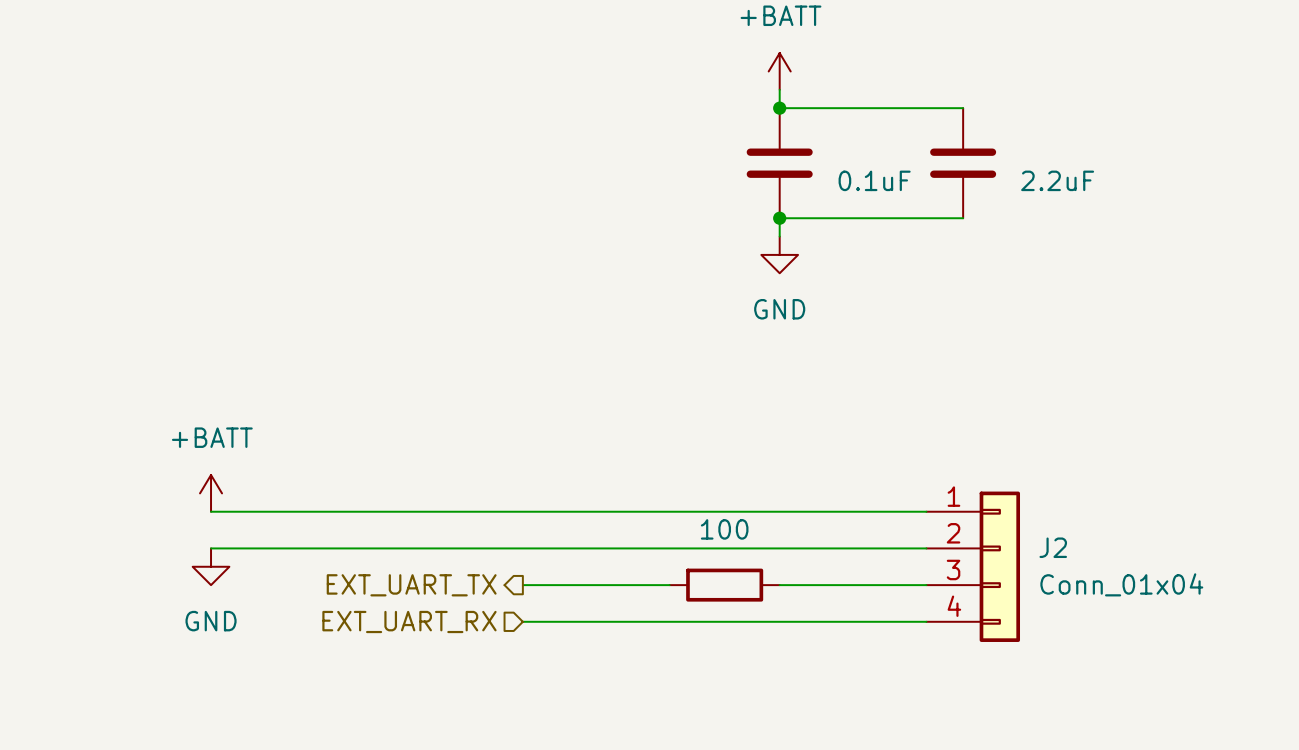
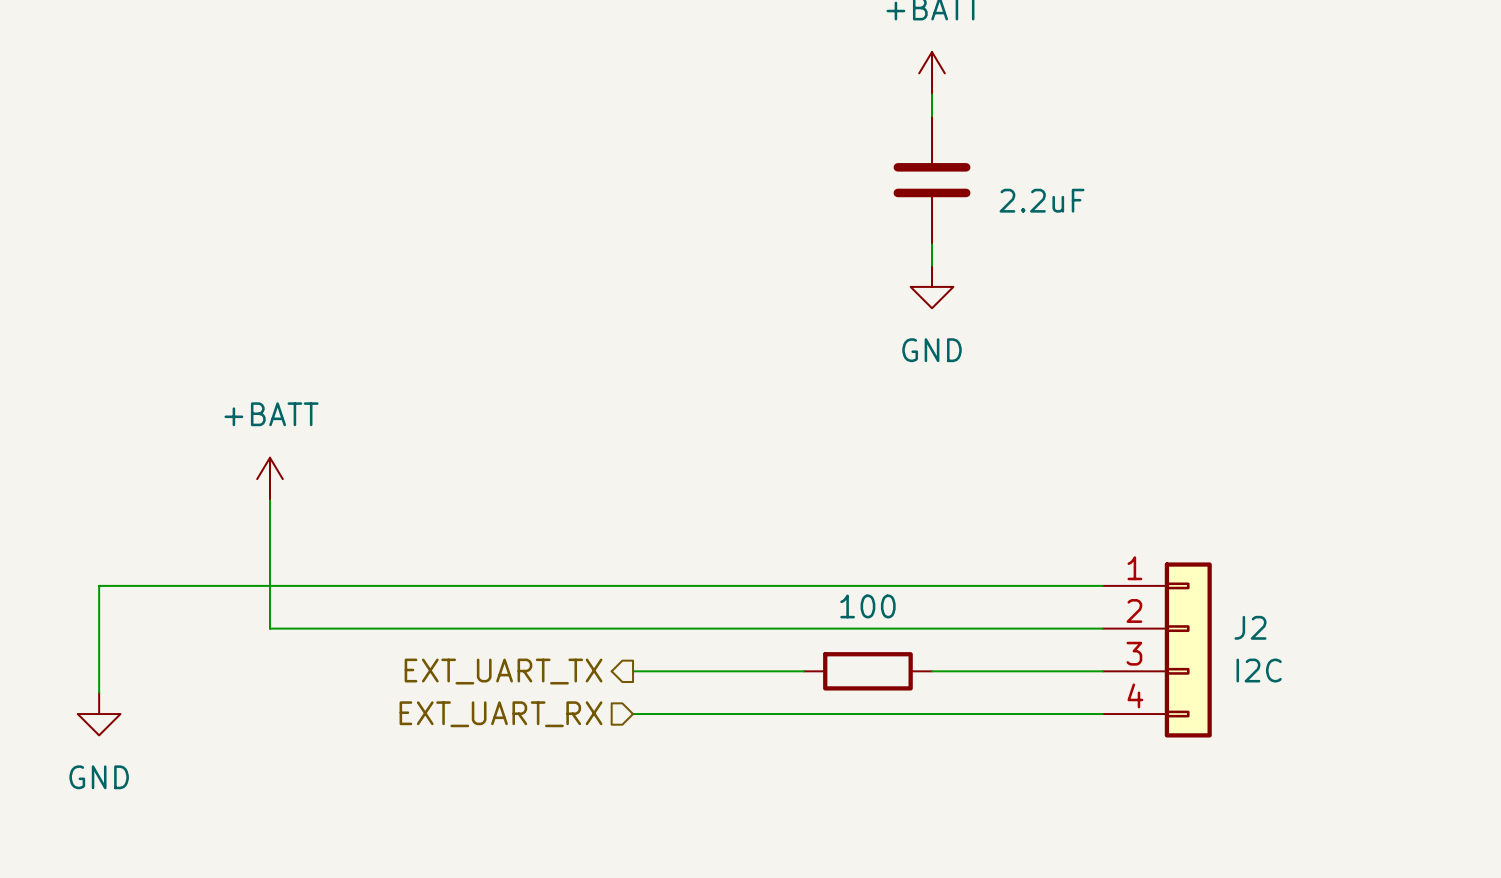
wire: (779, 108) (963, 108) -> none
junction: (779, 108) -> none
part: 2.2uF (963, 163) -> none
part value: 0.1uF (874, 180) -> 2.2uF (1042, 200)
wire: (779, 218) (963, 218) -> none
junction: (779, 218) -> none
wire: none -> (269, 500) (269, 628)
power symbol position: +BATT (211, 493) -> +BATT (269, 479)
wire: none -> (269, 585) (99, 585) (99, 692)
power symbol position: GND (211, 566) -> GND (99, 714)
J2 value: Conn_01x04 (1121, 584) -> I2C (1259, 670)

